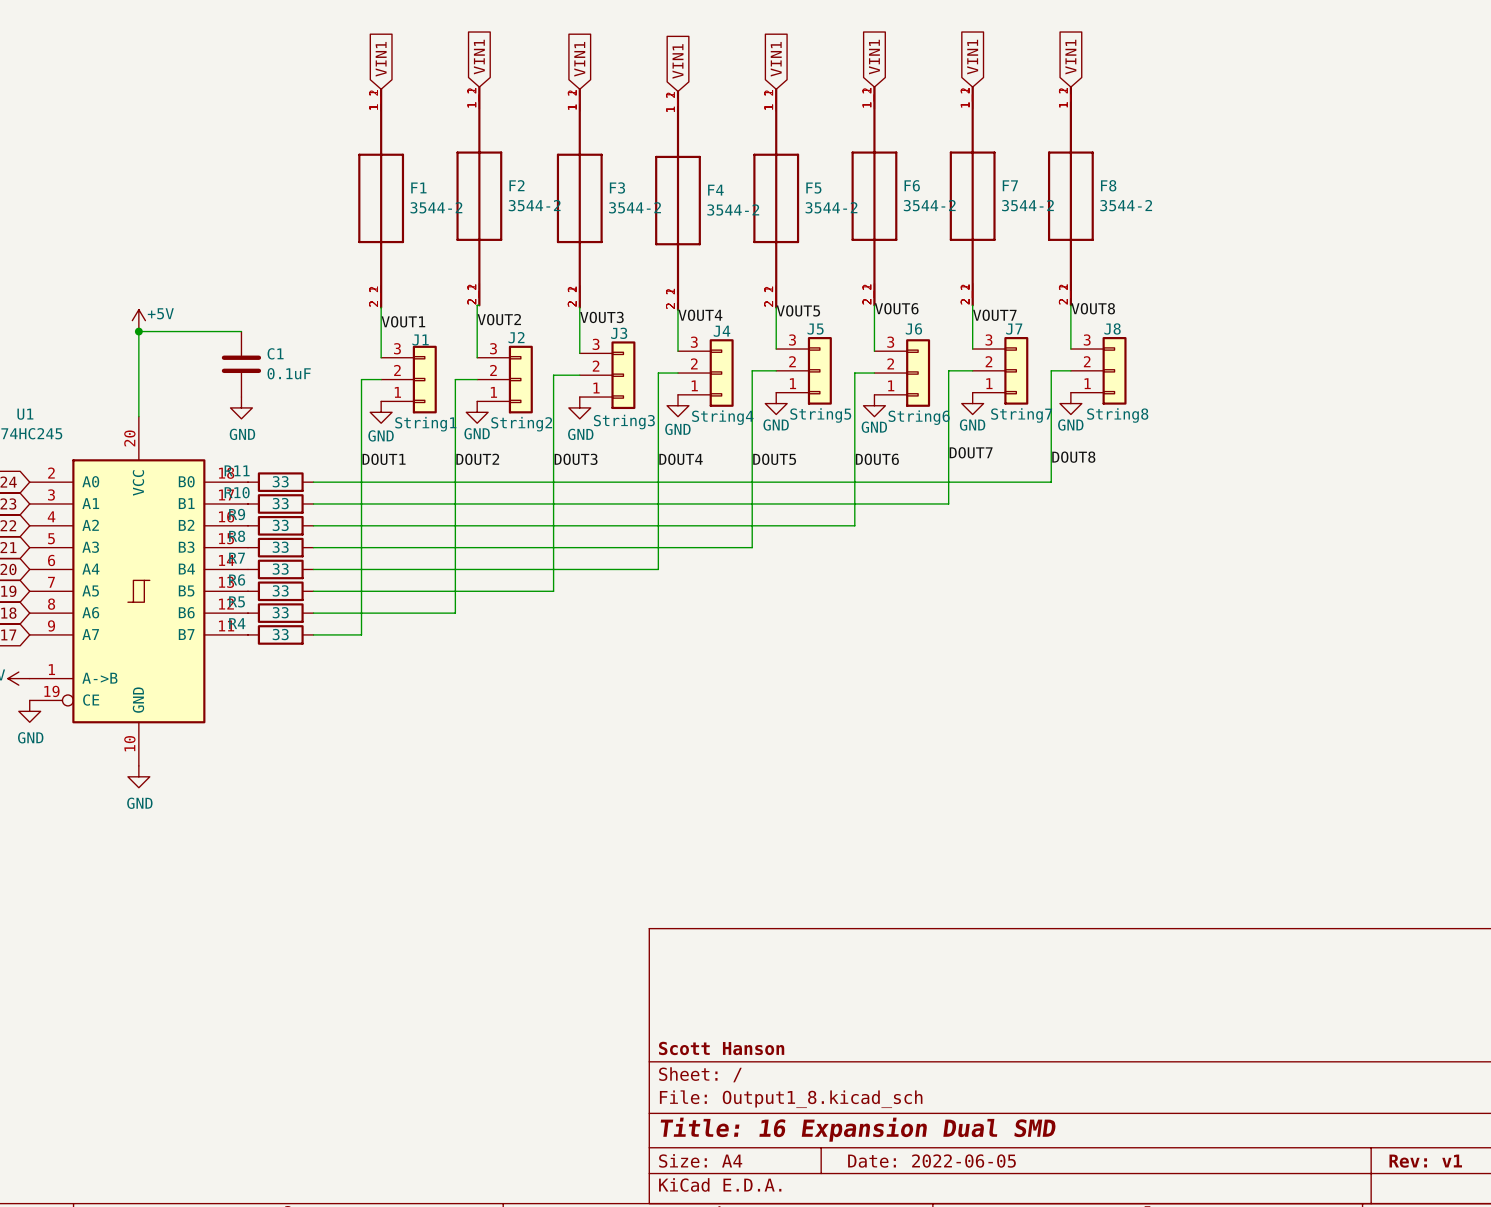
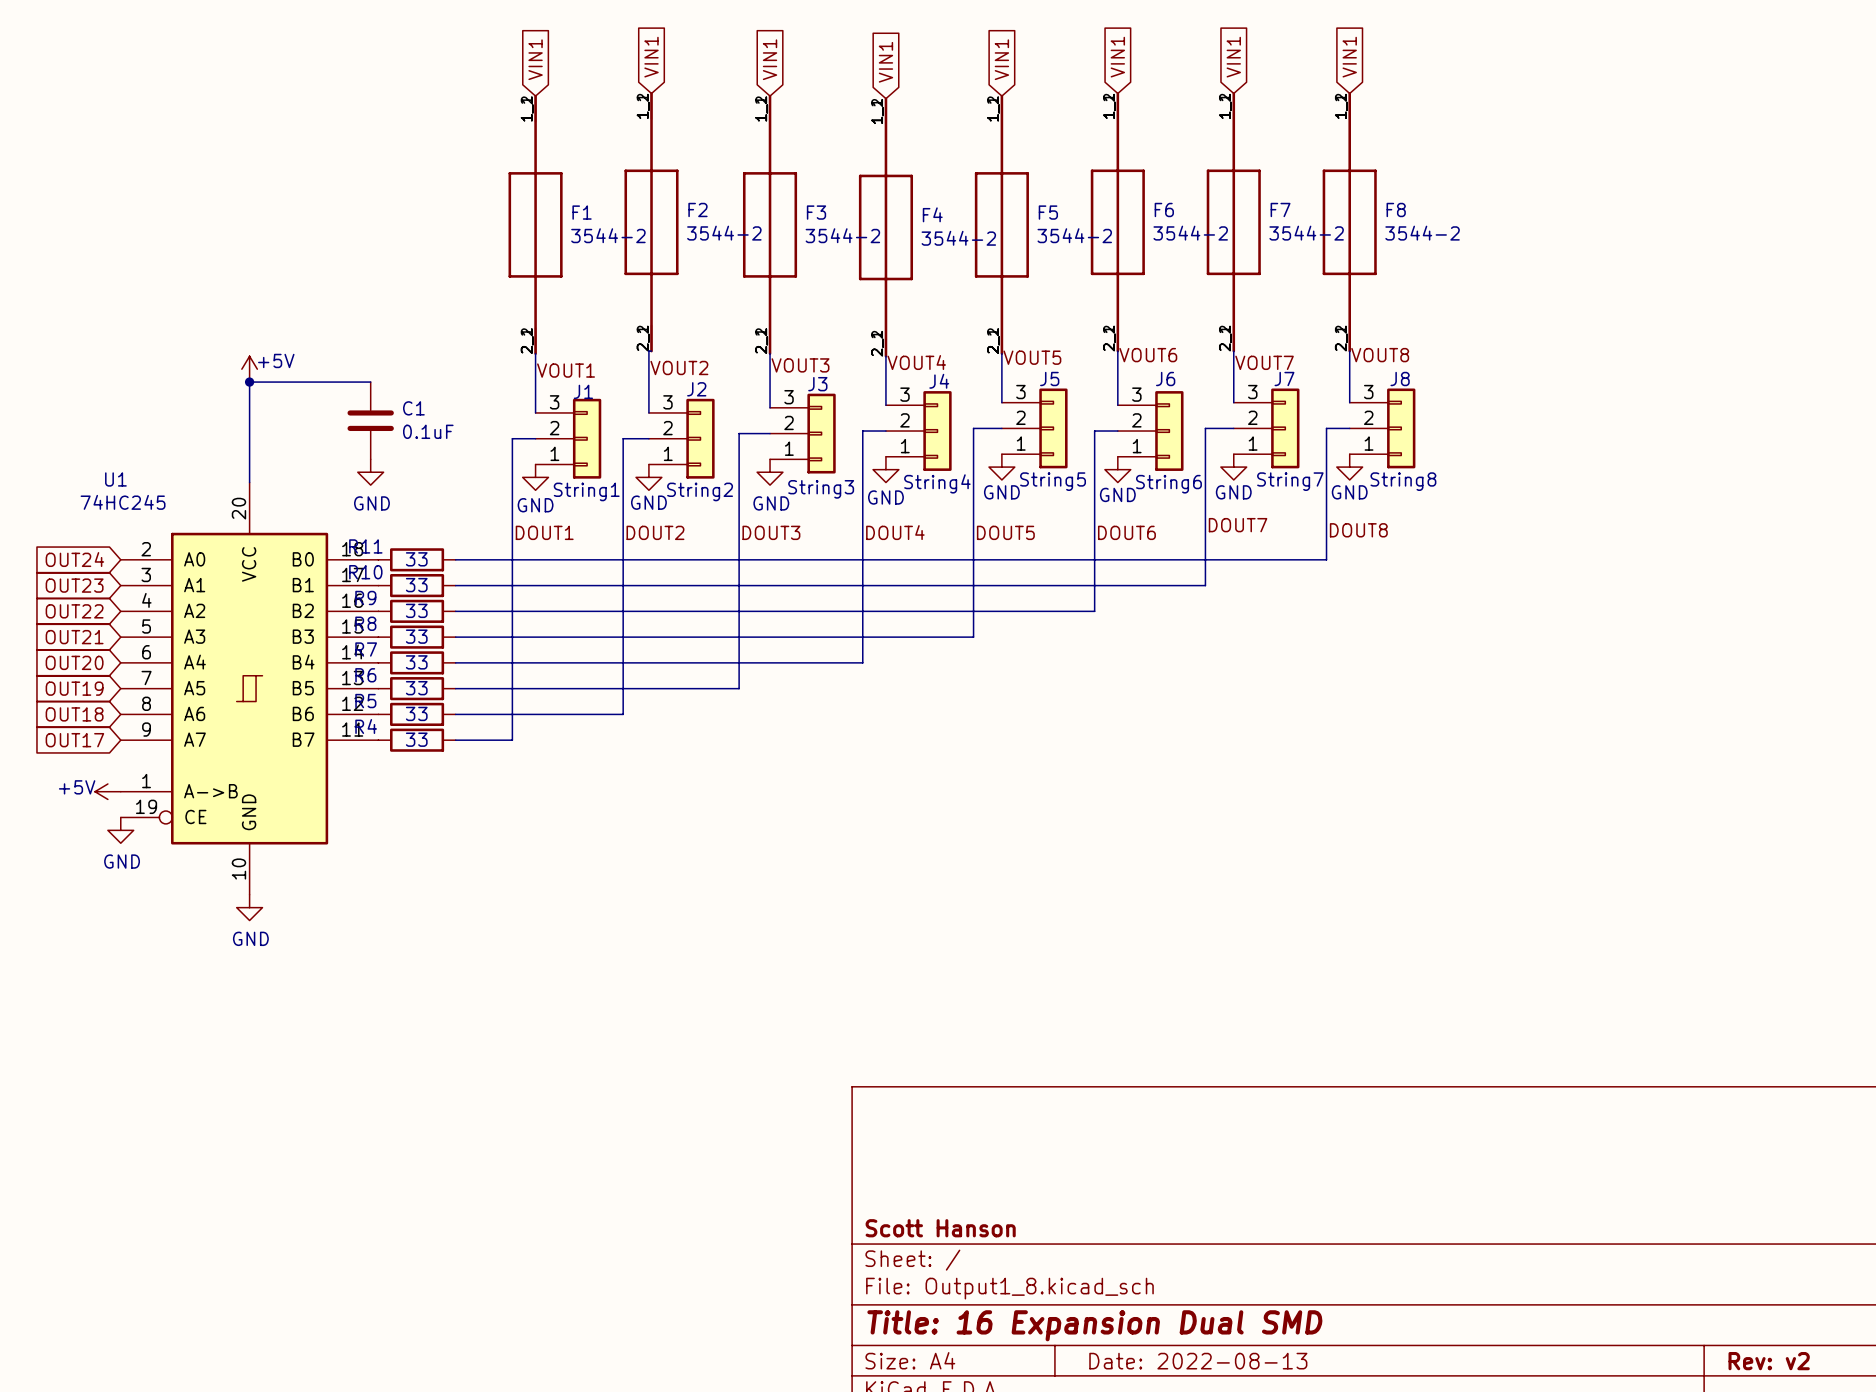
title block: Date: 2022-06-05 (931, 1161) -> Date: 2022-08-13 (1198, 1361)
title block: Rev: v1 (1425, 1161) -> Rev: v2 (1769, 1361)

